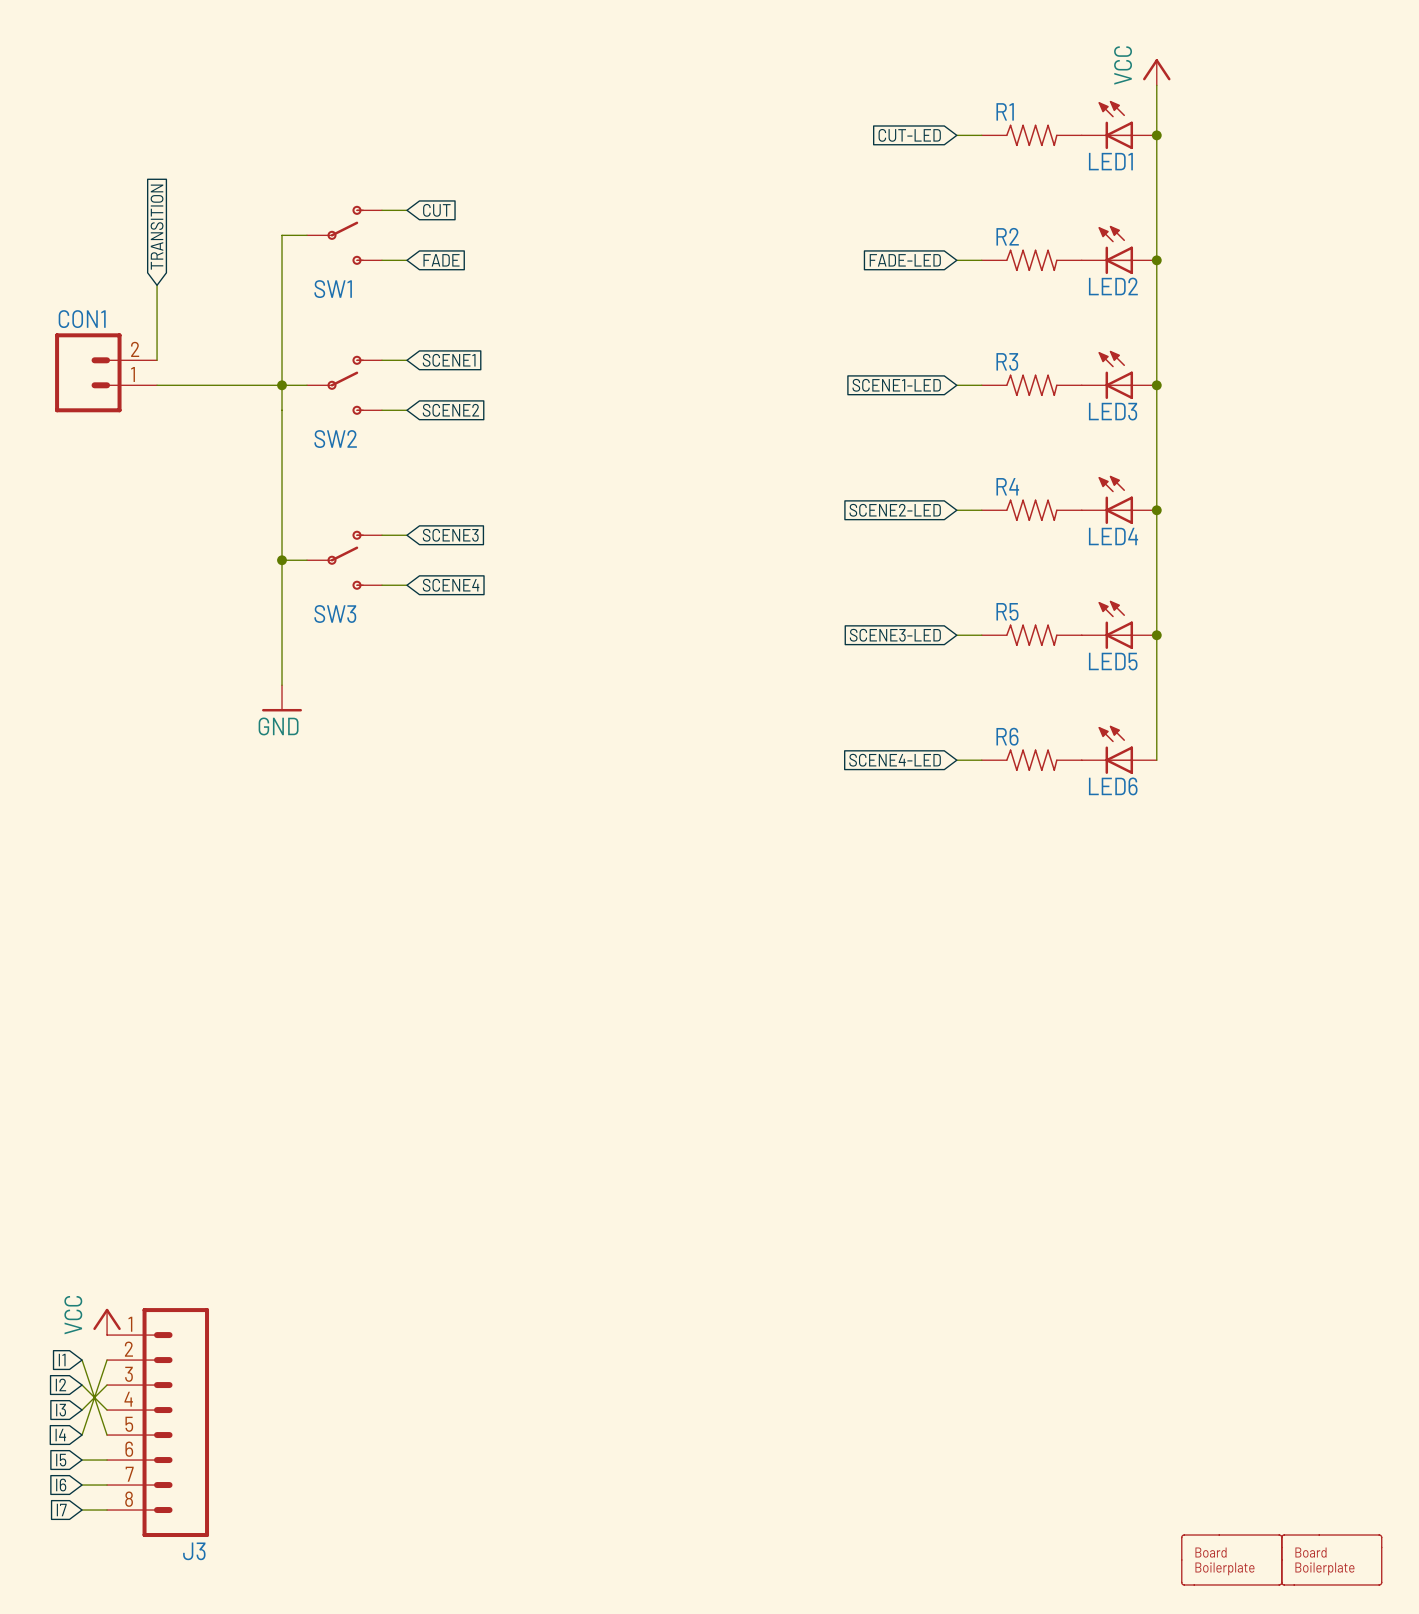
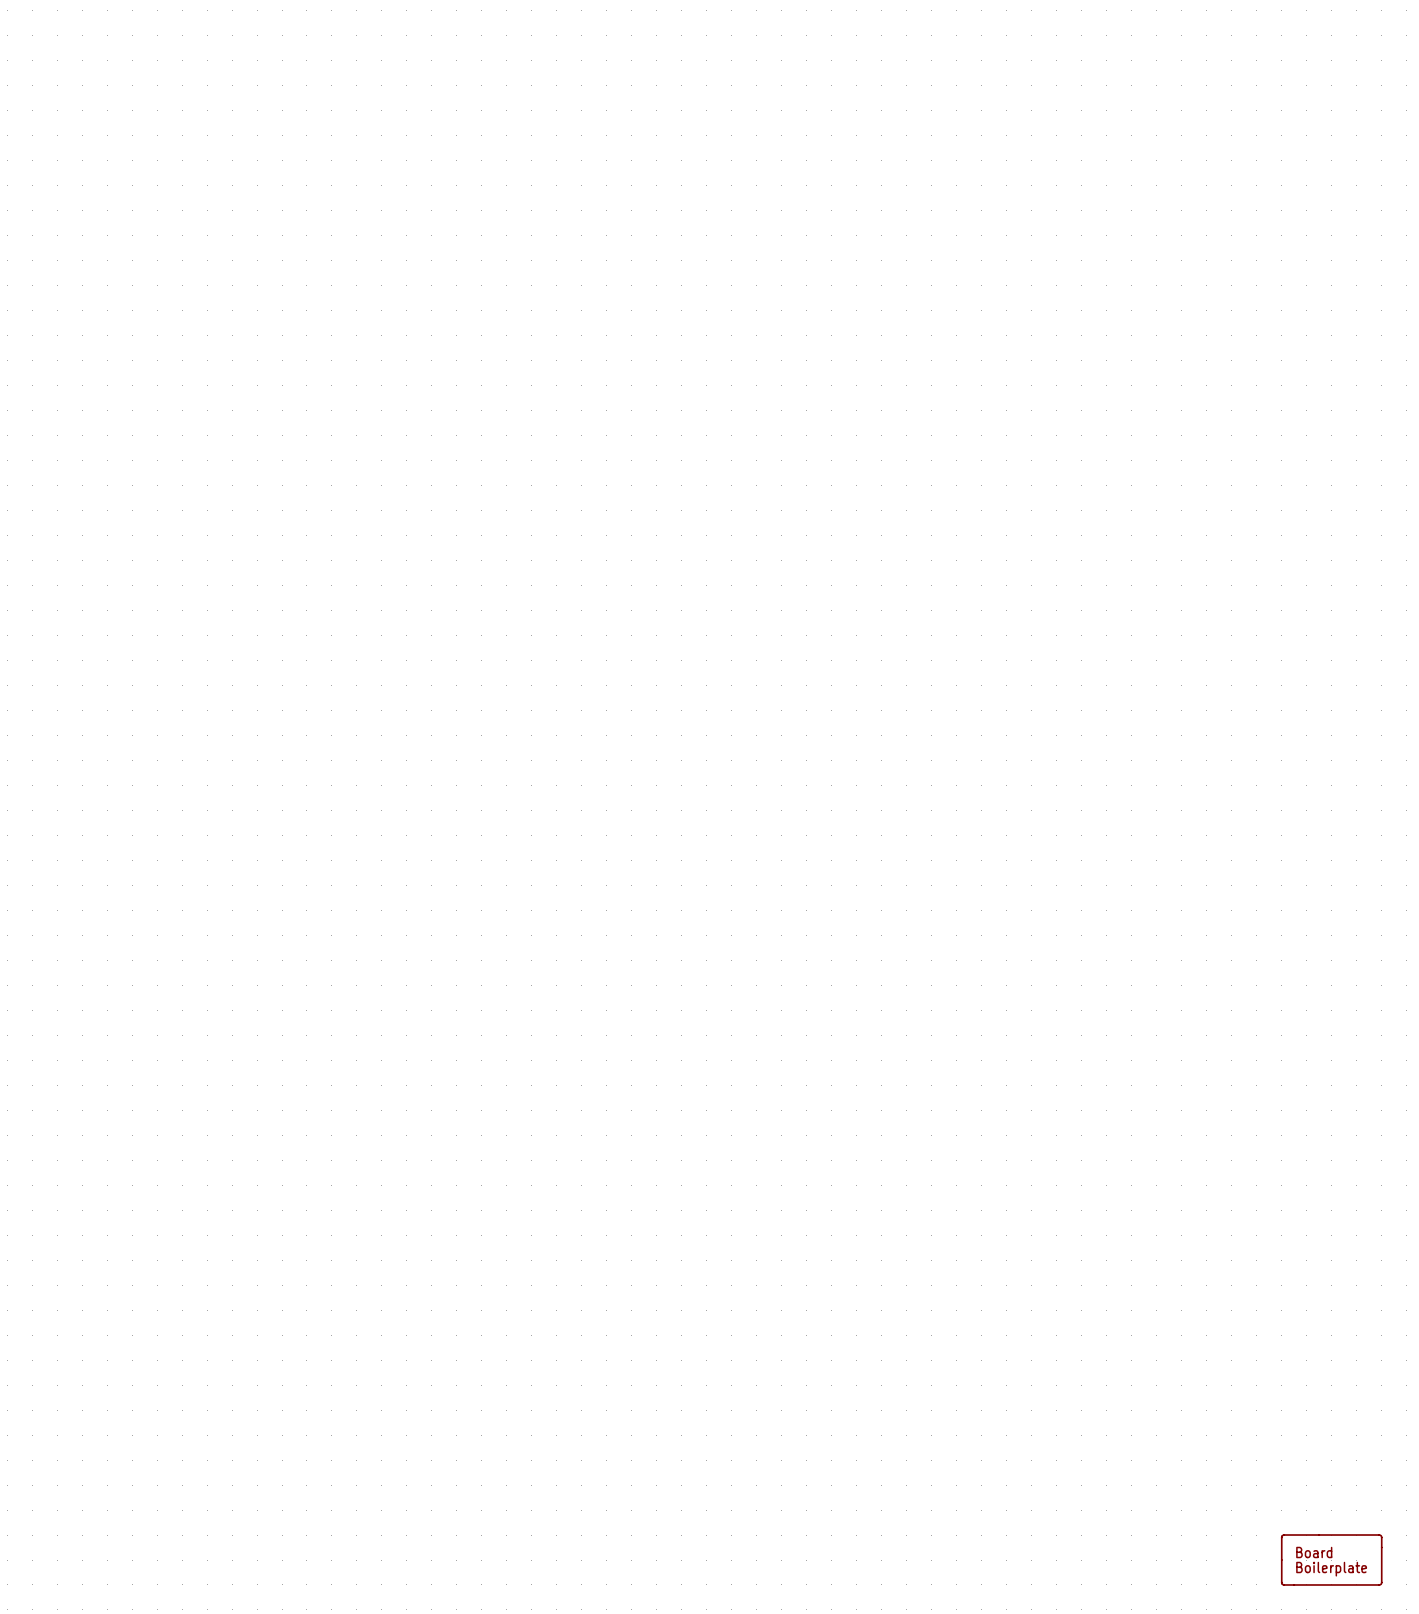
power symbol: VCC (1156, 72) -> none
wire: (1156, 85) (1156, 760) -> none
LED1: (1119, 124) -> none
global label: CUT-LED (909, 135) -> none
wire: (956, 135) (981, 135) -> none
R1: (1031, 135) -> none
junction: (1156, 135) -> none
wire: (381, 210) (406, 210) -> none
global label: CUT (436, 210) -> none
global label: TRANSITION (157, 227) -> none
wire: (306, 235) (282, 235) (282, 685) -> none
SW1: (344, 235) -> none
LED2: (1119, 249) -> none
wire: (381, 260) (406, 260) -> none
global label: FADE (441, 260) -> none
global label: FADE-LED (905, 260) -> none
wire: (956, 260) (981, 260) -> none
R2: (1031, 260) -> none
junction: (1156, 260) -> none
wire: (157, 285) (157, 360) -> none
wire: (381, 360) (406, 360) -> none
global label: SCENE1 (449, 360) -> none
CON1: (106, 372) -> none
LED3: (1119, 374) -> none
wire: (157, 385) (306, 385) -> none
junction: (282, 385) -> none
SW2: (344, 385) -> none
global label: SCENE1-LED (896, 385) -> none
wire: (956, 385) (981, 385) -> none
R3: (1031, 385) -> none
junction: (1156, 385) -> none
wire: (381, 410) (406, 410) -> none
global label: SCENE2 (450, 410) -> none
LED4: (1119, 499) -> none
global label: SCENE2-LED (895, 510) -> none
wire: (956, 510) (981, 510) -> none
R4: (1031, 510) -> none
junction: (1156, 510) -> none
wire: (381, 535) (406, 535) -> none
global label: SCENE3 (450, 535) -> none
wire: (282, 560) (306, 560) -> none
junction: (282, 560) -> none
SW3: (344, 560) -> none
wire: (381, 585) (406, 585) -> none
global label: SCENE4 (451, 585) -> none
LED5: (1119, 624) -> none
global label: SCENE3-LED (895, 635) -> none
wire: (956, 635) (981, 635) -> none
R5: (1031, 635) -> none
junction: (1156, 635) -> none
power symbol: GND (282, 698) -> none
LED6: (1119, 749) -> none
global label: SCENE4-LED (895, 760) -> none
wire: (956, 760) (981, 760) -> none
R6: (1031, 760) -> none
power symbol: VCC (107, 1321) -> none
global label: I1 (62, 1360) -> none
wire: (82, 1360) (107, 1435) -> none
wire: (107, 1360) (82, 1435) -> none
global label: I2 (60, 1384) -> none
wire: (82, 1385) (107, 1410) -> none
wire: (107, 1385) (82, 1410) -> none
global label: I3 (61, 1410) -> none
J3: (158, 1422) -> none
global label: I4 (60, 1435) -> none
global label: I5 (61, 1460) -> none
wire: (82, 1460) (107, 1460) -> none
global label: I6 (61, 1485) -> none
wire: (82, 1485) (107, 1485) -> none
global label: I7 (61, 1510) -> none
wire: (82, 1510) (107, 1510) -> none
part: (1231, 1560) -> none

